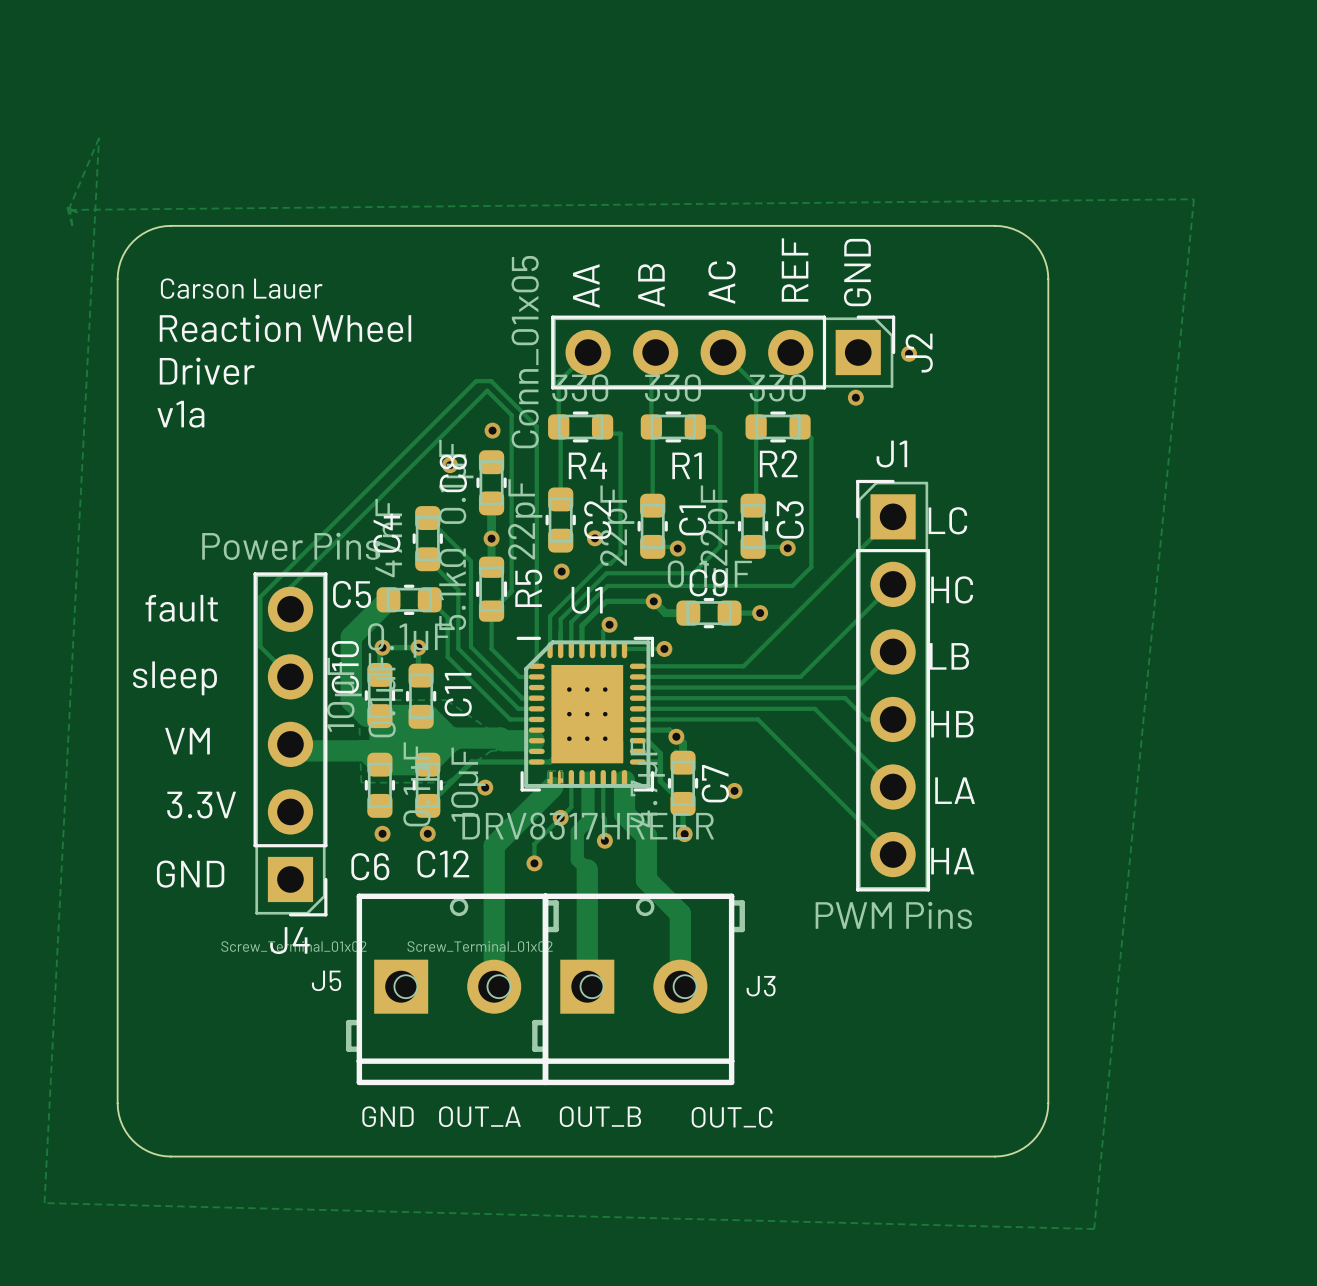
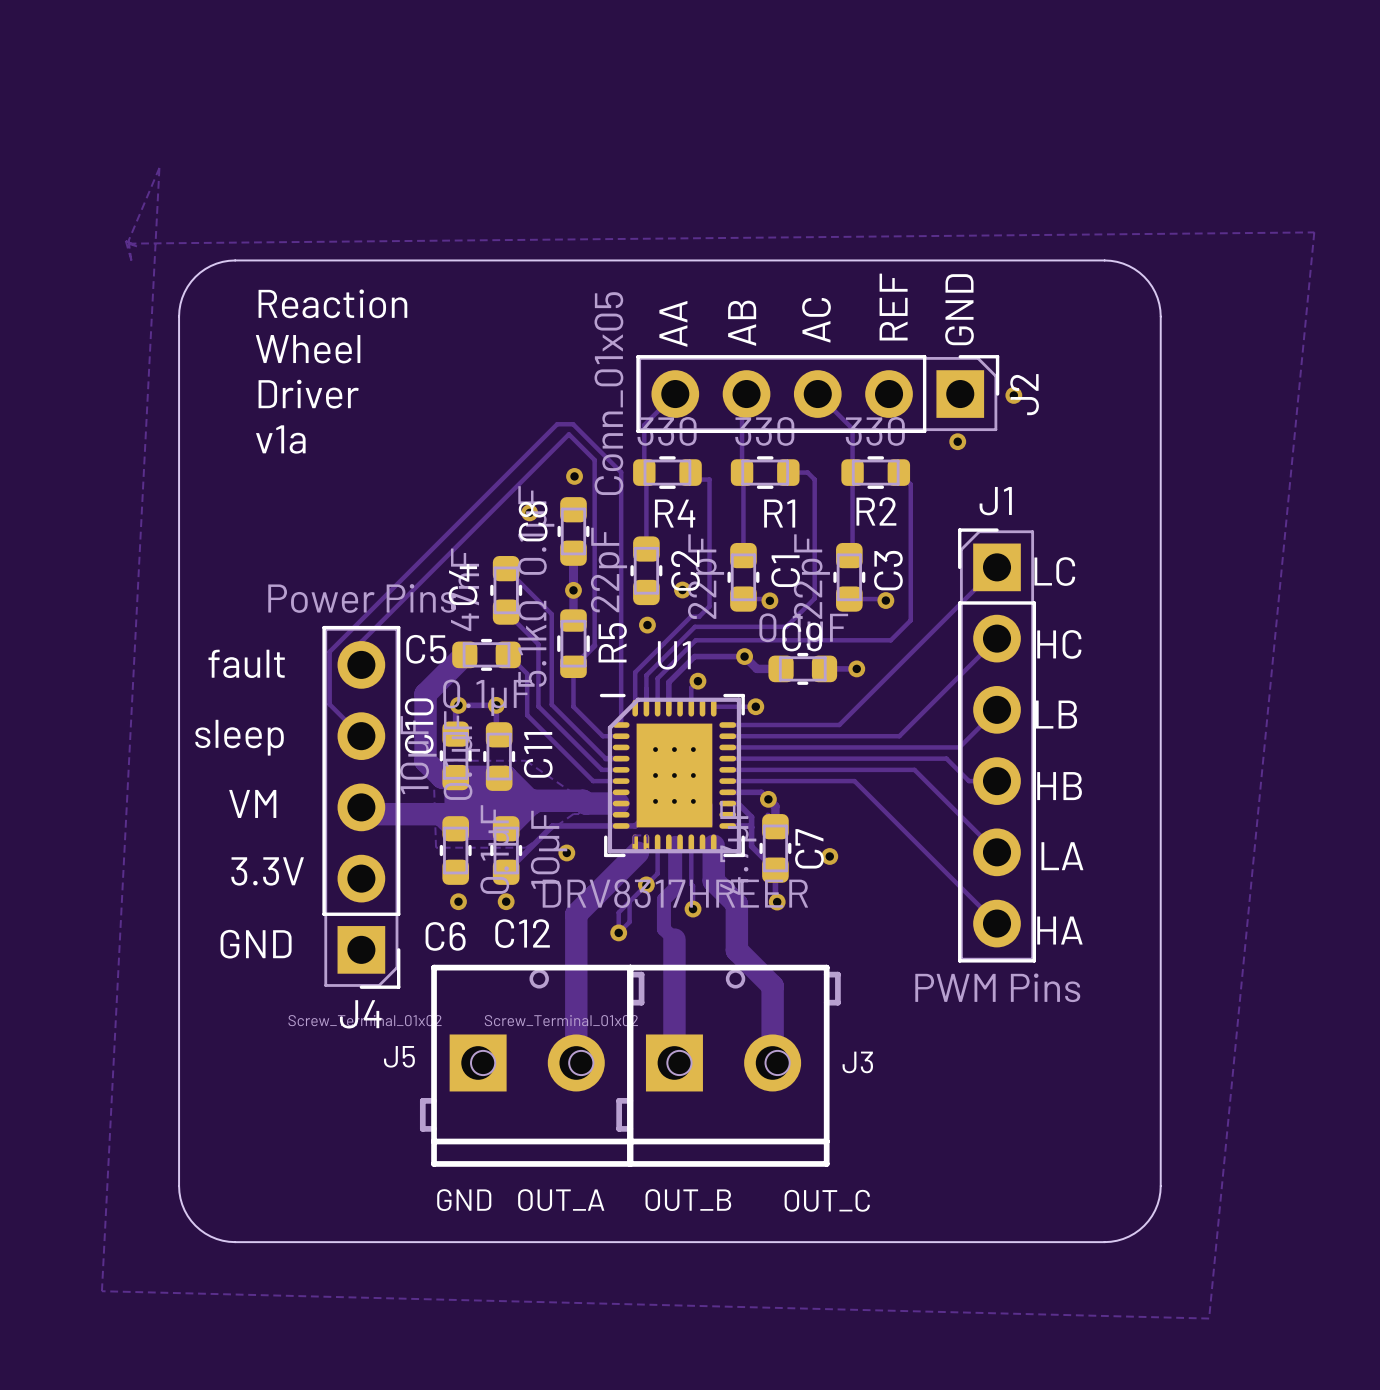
text: none -> Reaction (332, 303)
text: Carson Lauer (241, 288) -> none
text: none -> Wheel (308, 349)
text: Reaction Wheel (285, 328) -> none
text position: Driver (207, 371) -> Driver (308, 394)
text position: v1a (180, 414) -> v1a (280, 439)
track: none -> (629, 901) (629, 922) (618, 932)

